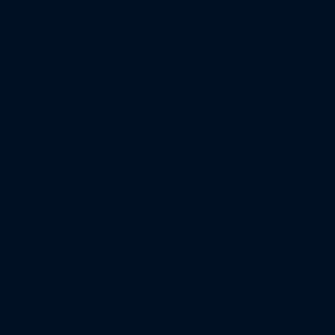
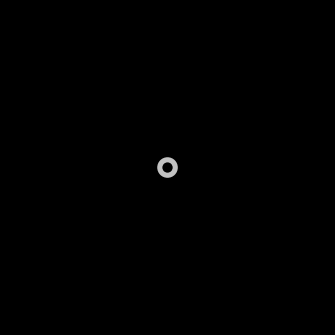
via: none -> (167, 167)

